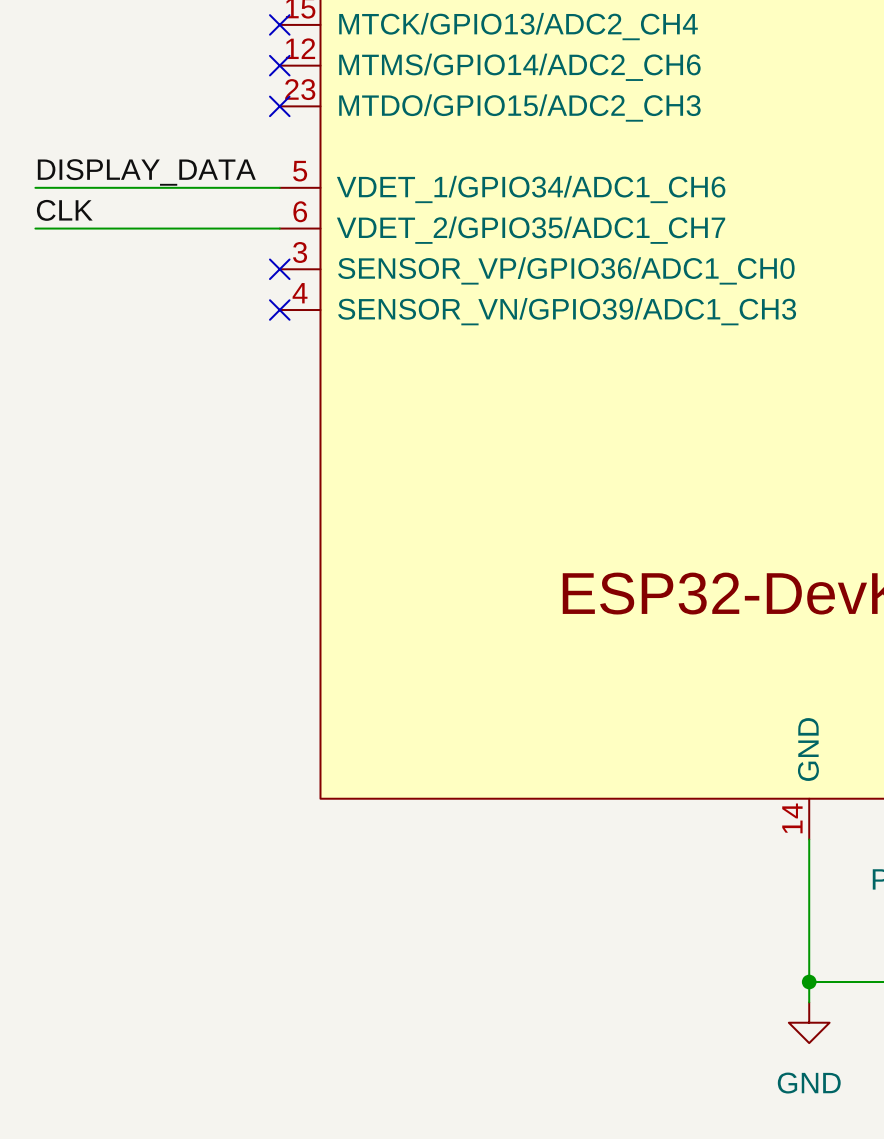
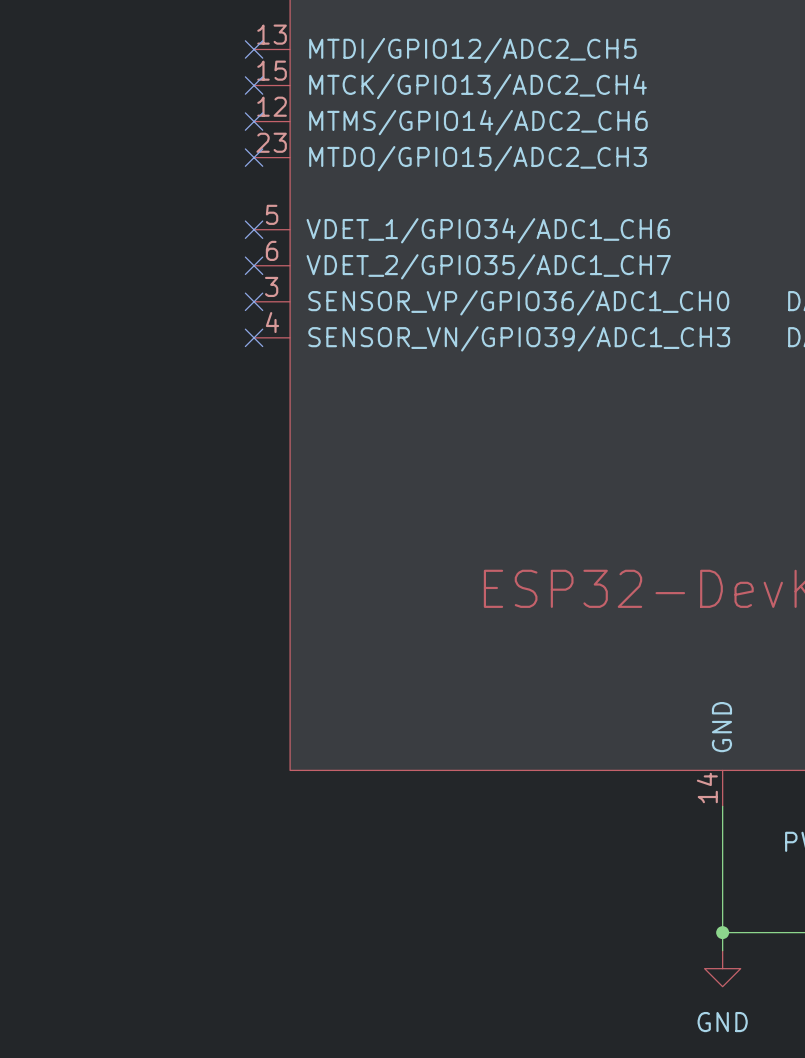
label: DISPLAY_DATA (146, 172) -> none
wire: (35, 187) (279, 187) -> none
no-connect mark: none -> (254, 229)
label: CLK (64, 210) -> none
wire: (35, 228) (279, 228) -> none
no-connect mark: none -> (254, 265)

